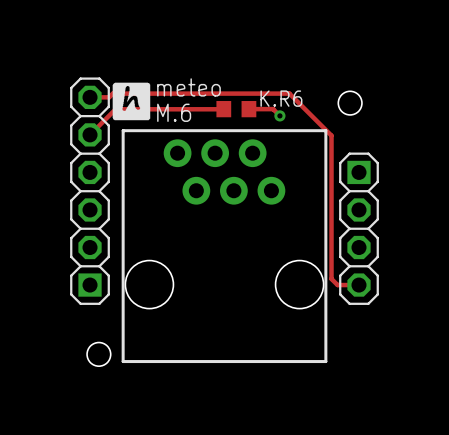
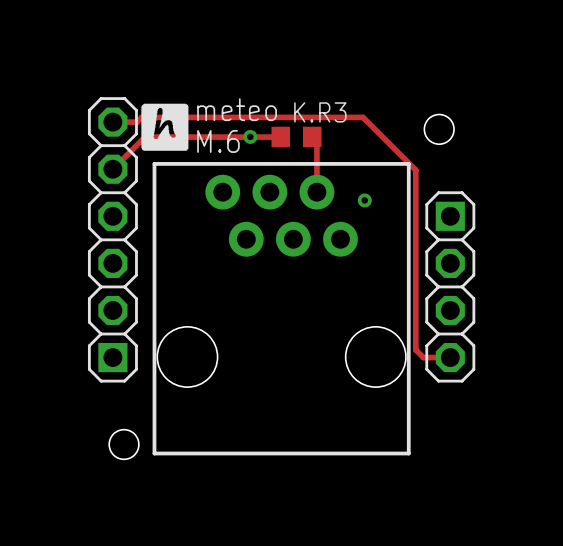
K.R6 name: K.R6 (281, 98) -> K.R3 (320, 112)
via: none -> (250, 136)
track: (248, 109) (273, 109) (279, 115) -> none
track: none -> (316, 137) (316, 192)
via: (279, 115) -> none
via: none -> (364, 200)

